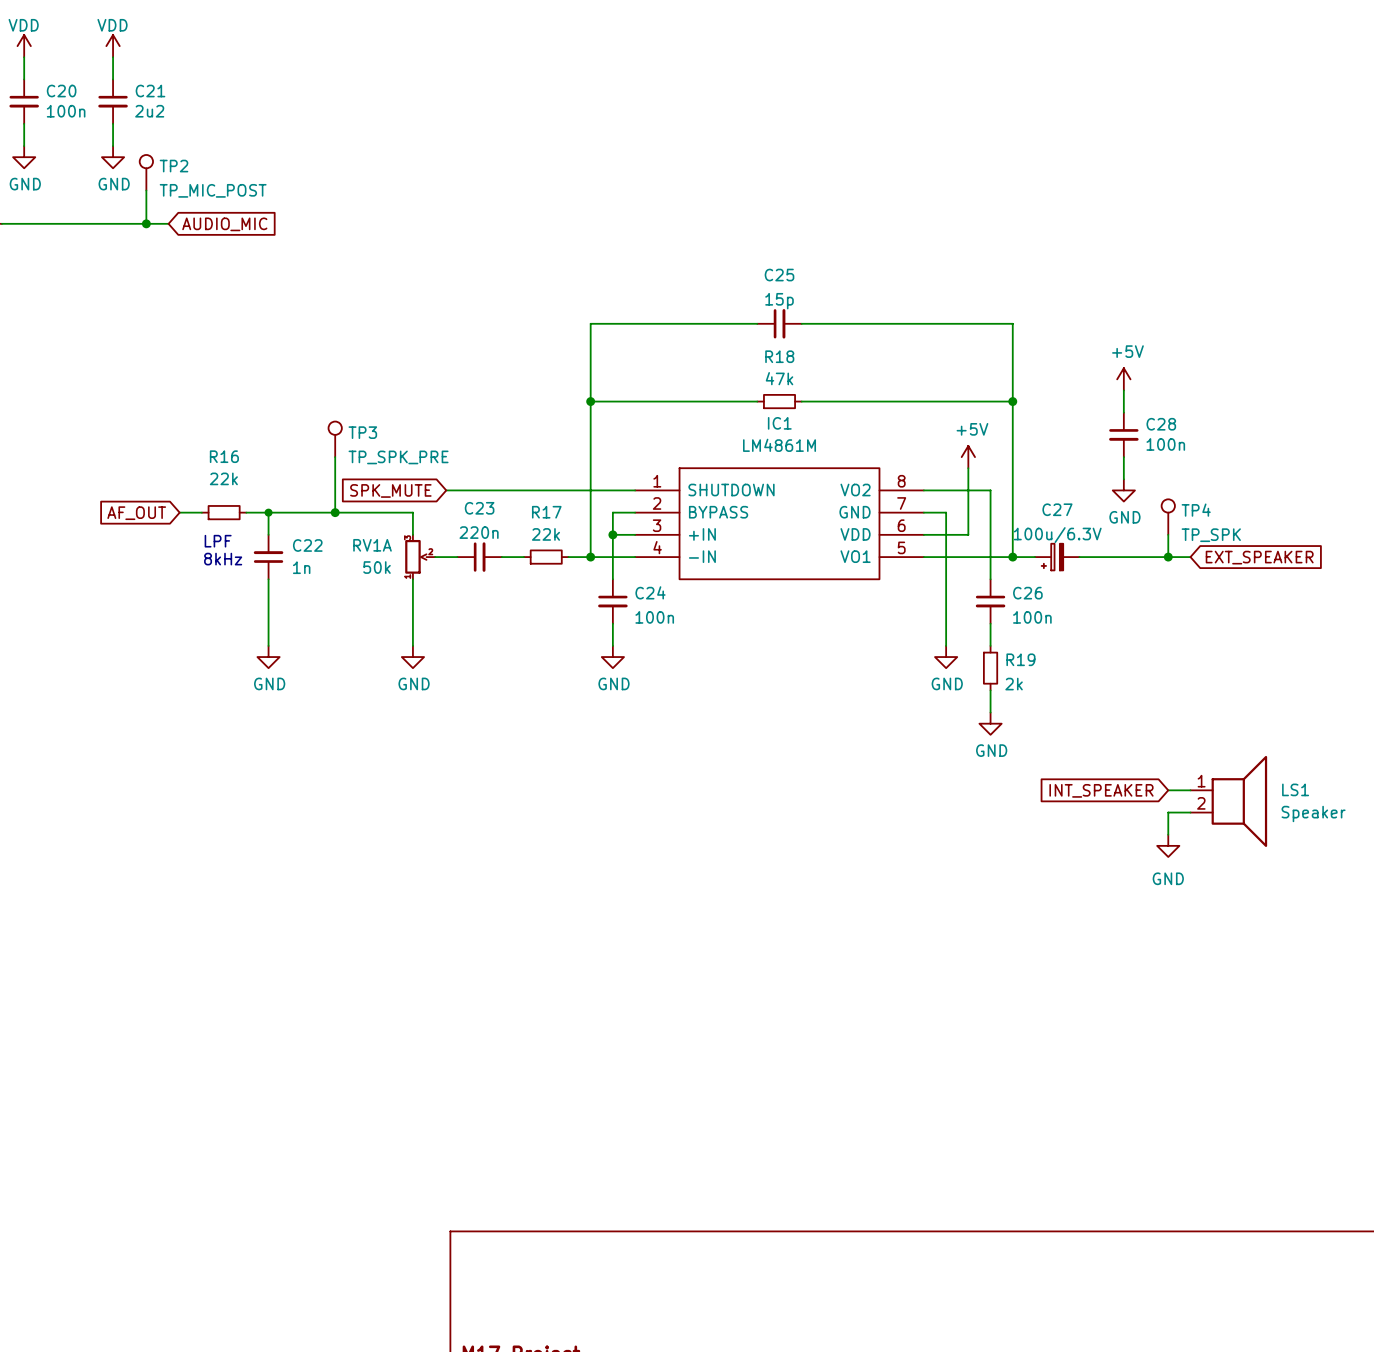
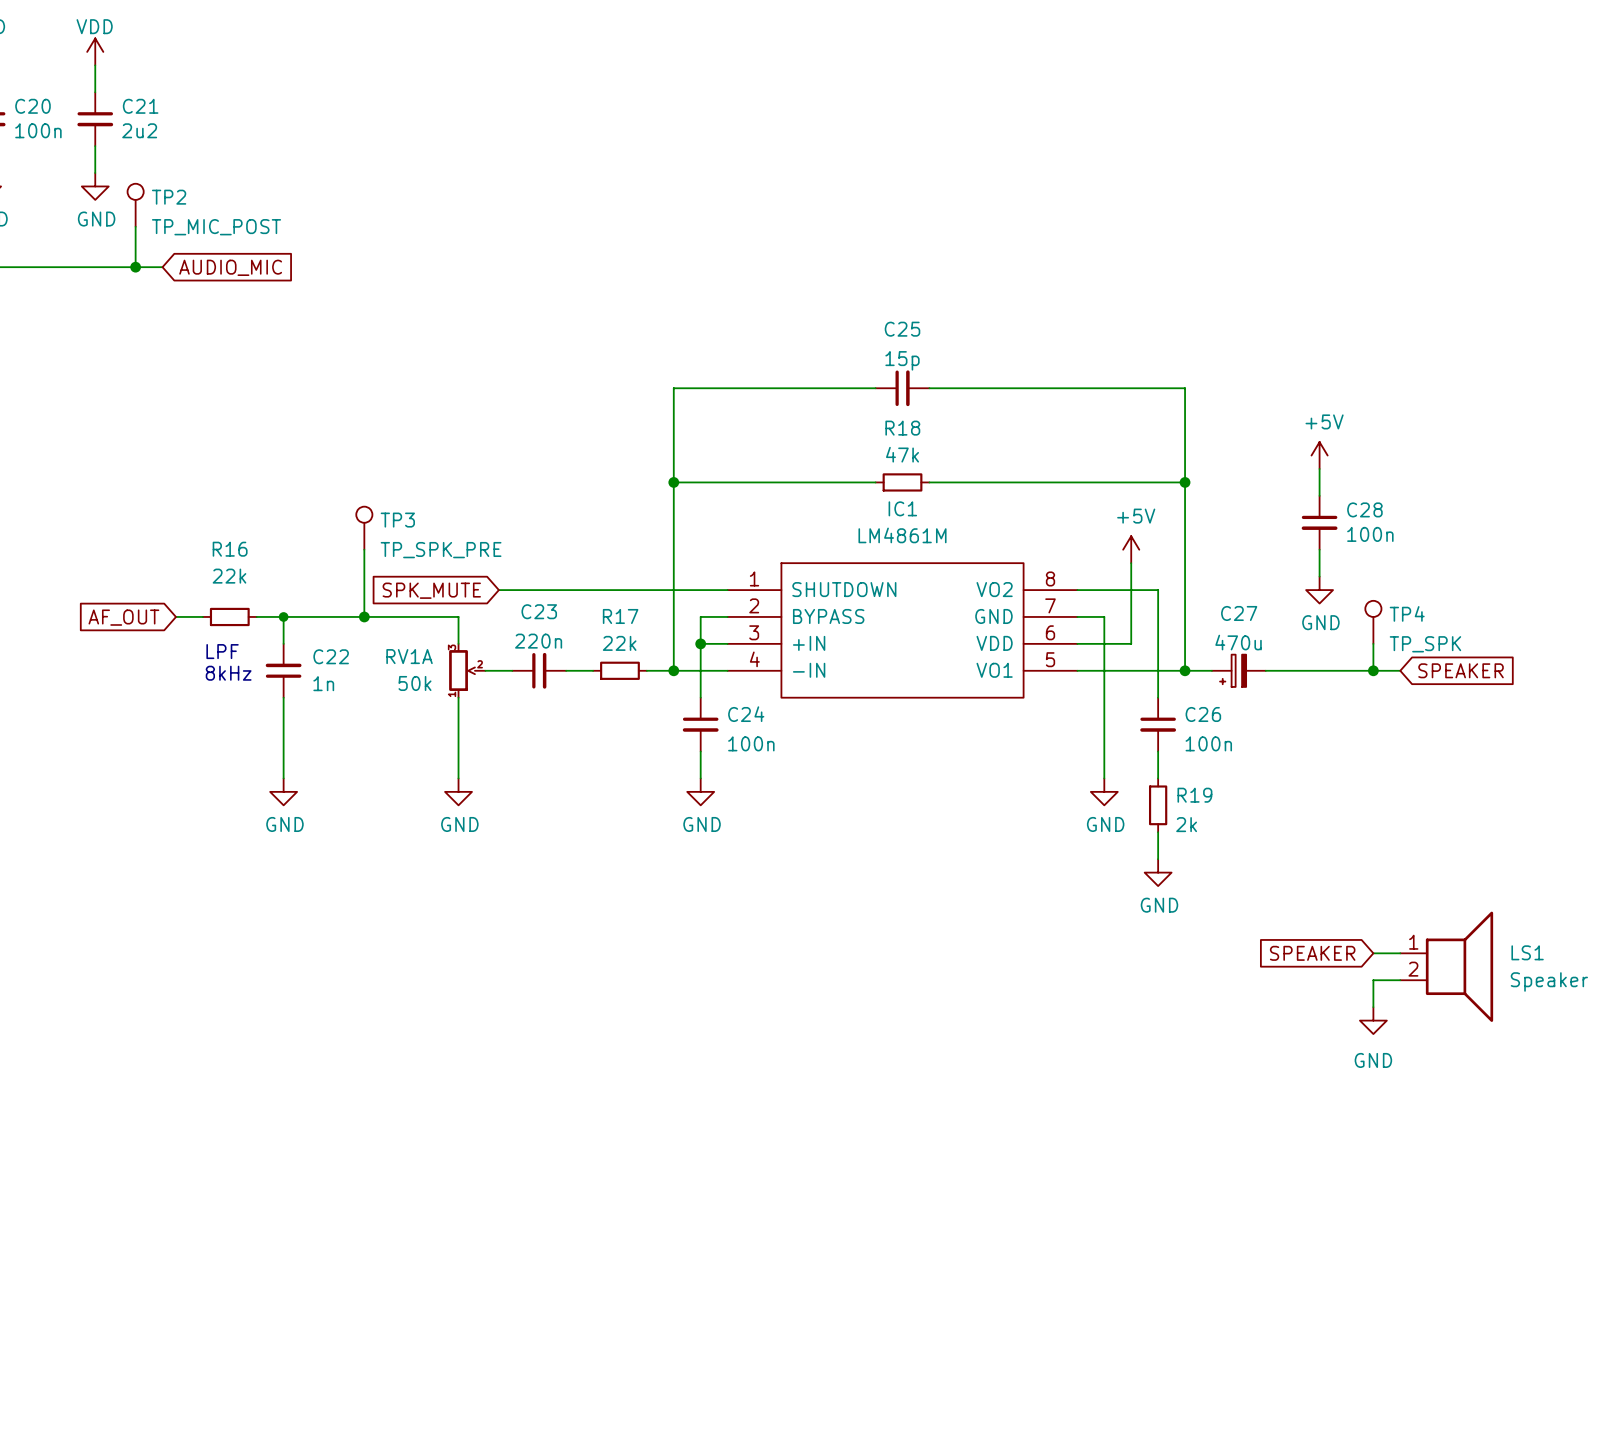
C27 value: 100u/6.3V (1057, 535) -> 470u (1238, 642)
global label: EXT_SPEAKER (1259, 557) -> SPEAKER (1461, 670)
global label: INT_SPEAKER (1101, 790) -> SPEAKER (1312, 953)

